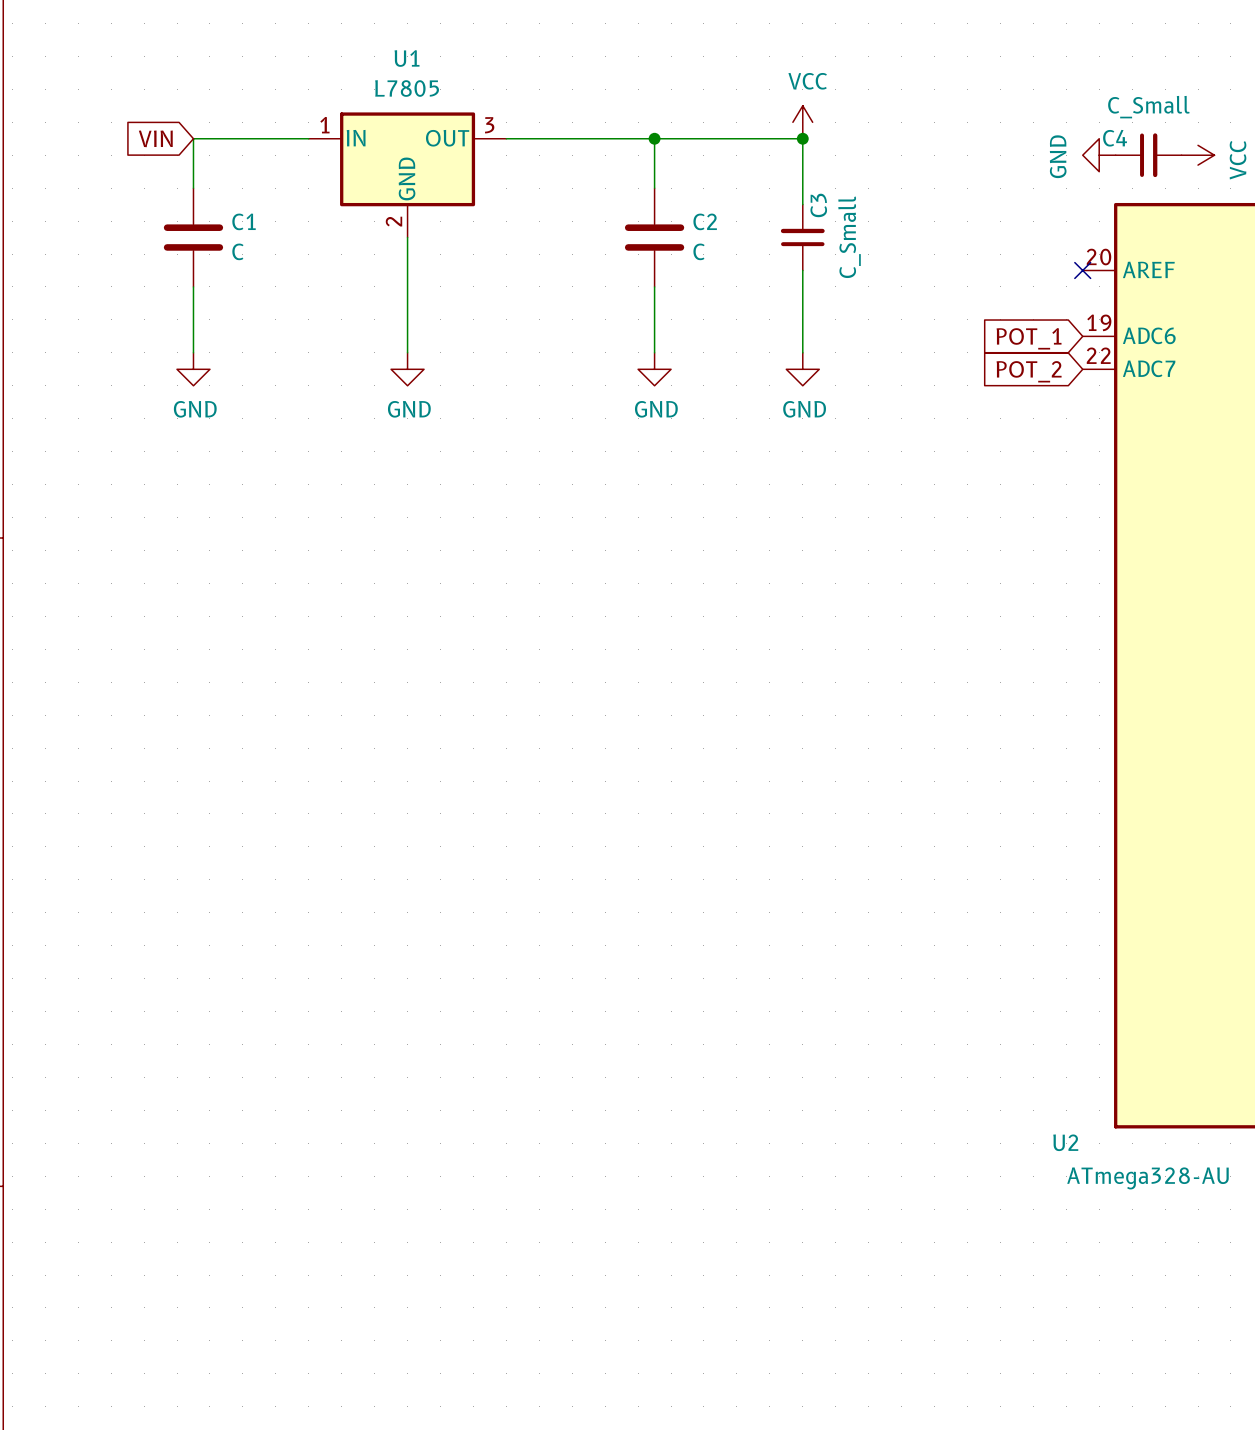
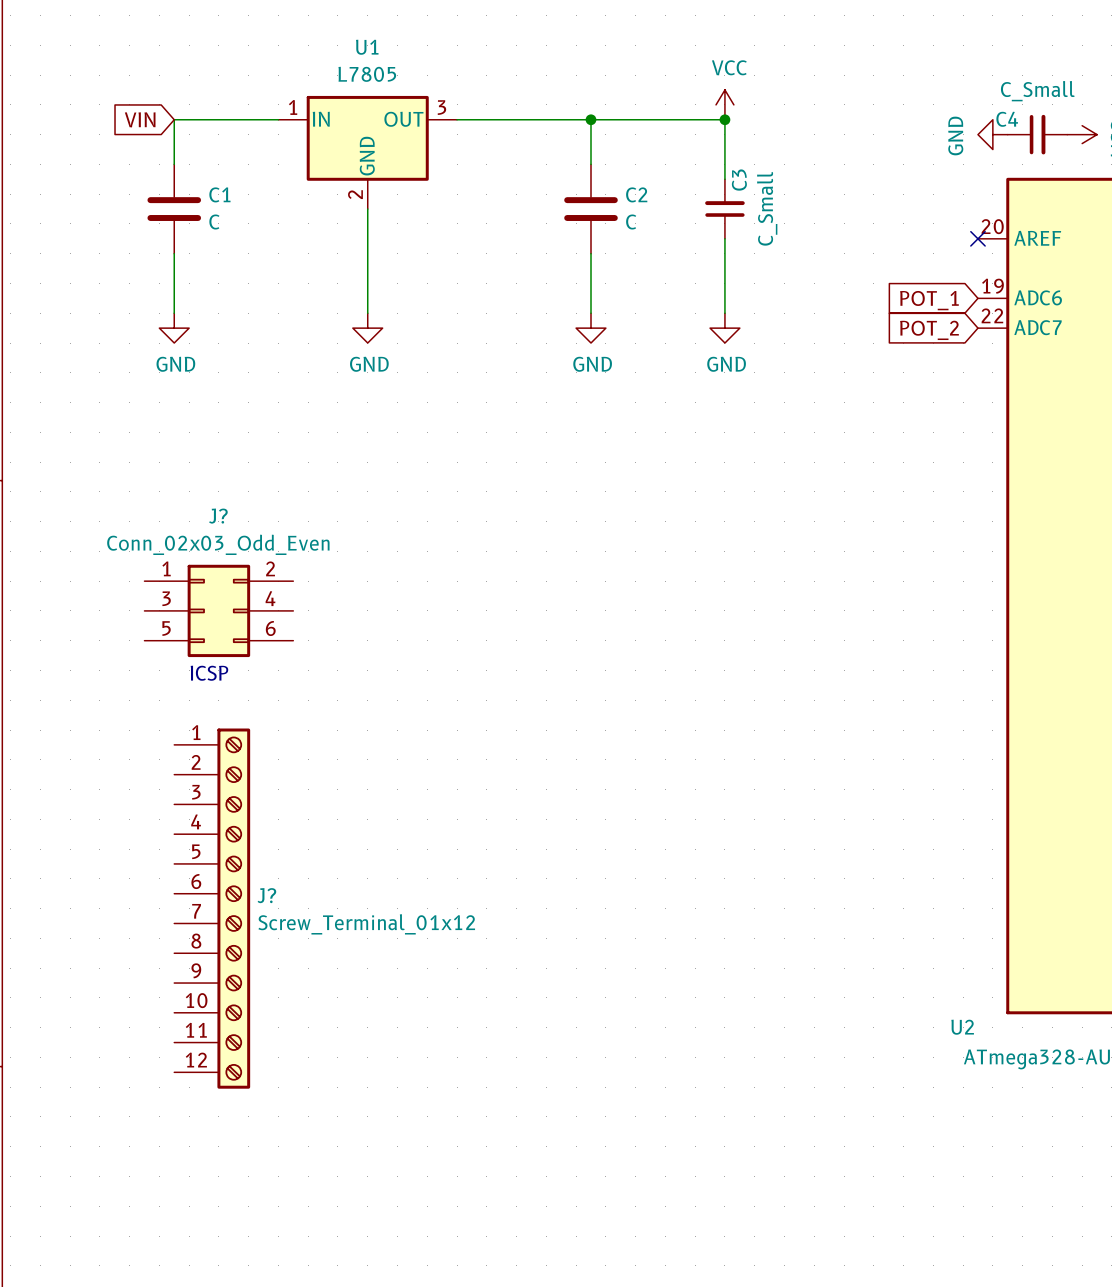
J?: none -> Conn_02x03_Odd_Even (218, 610)
text: none -> ICSP (209, 673)
J?: none -> Screw_Terminal_01x12 (212, 908)

